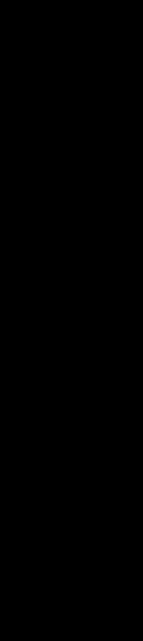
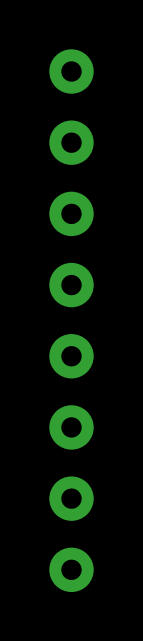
part: none -> (71, 320)

